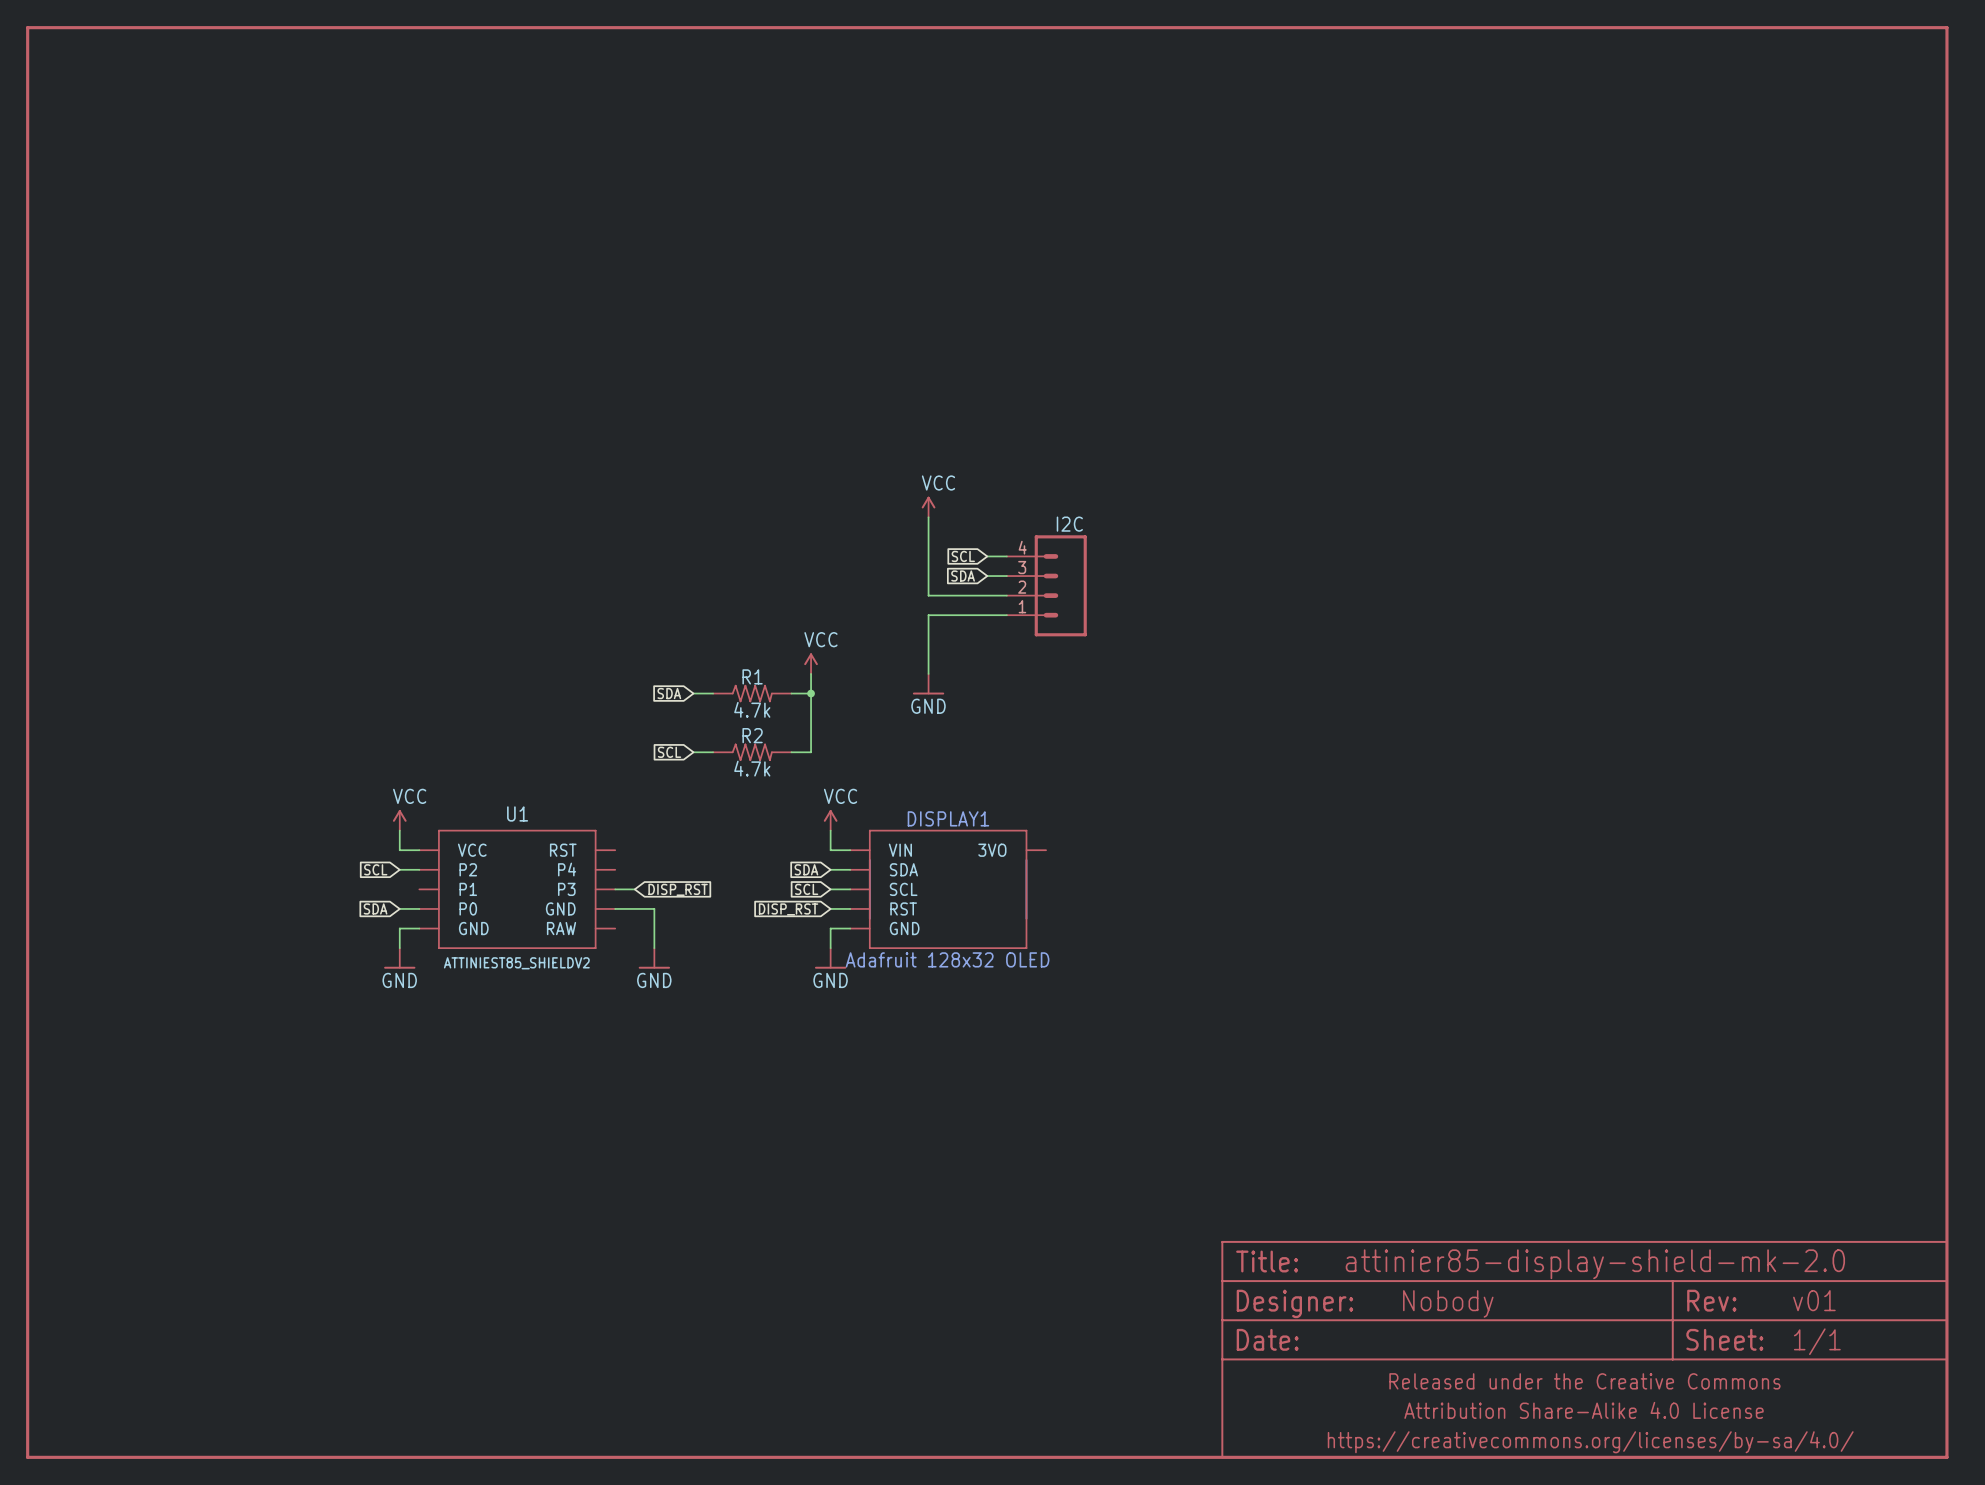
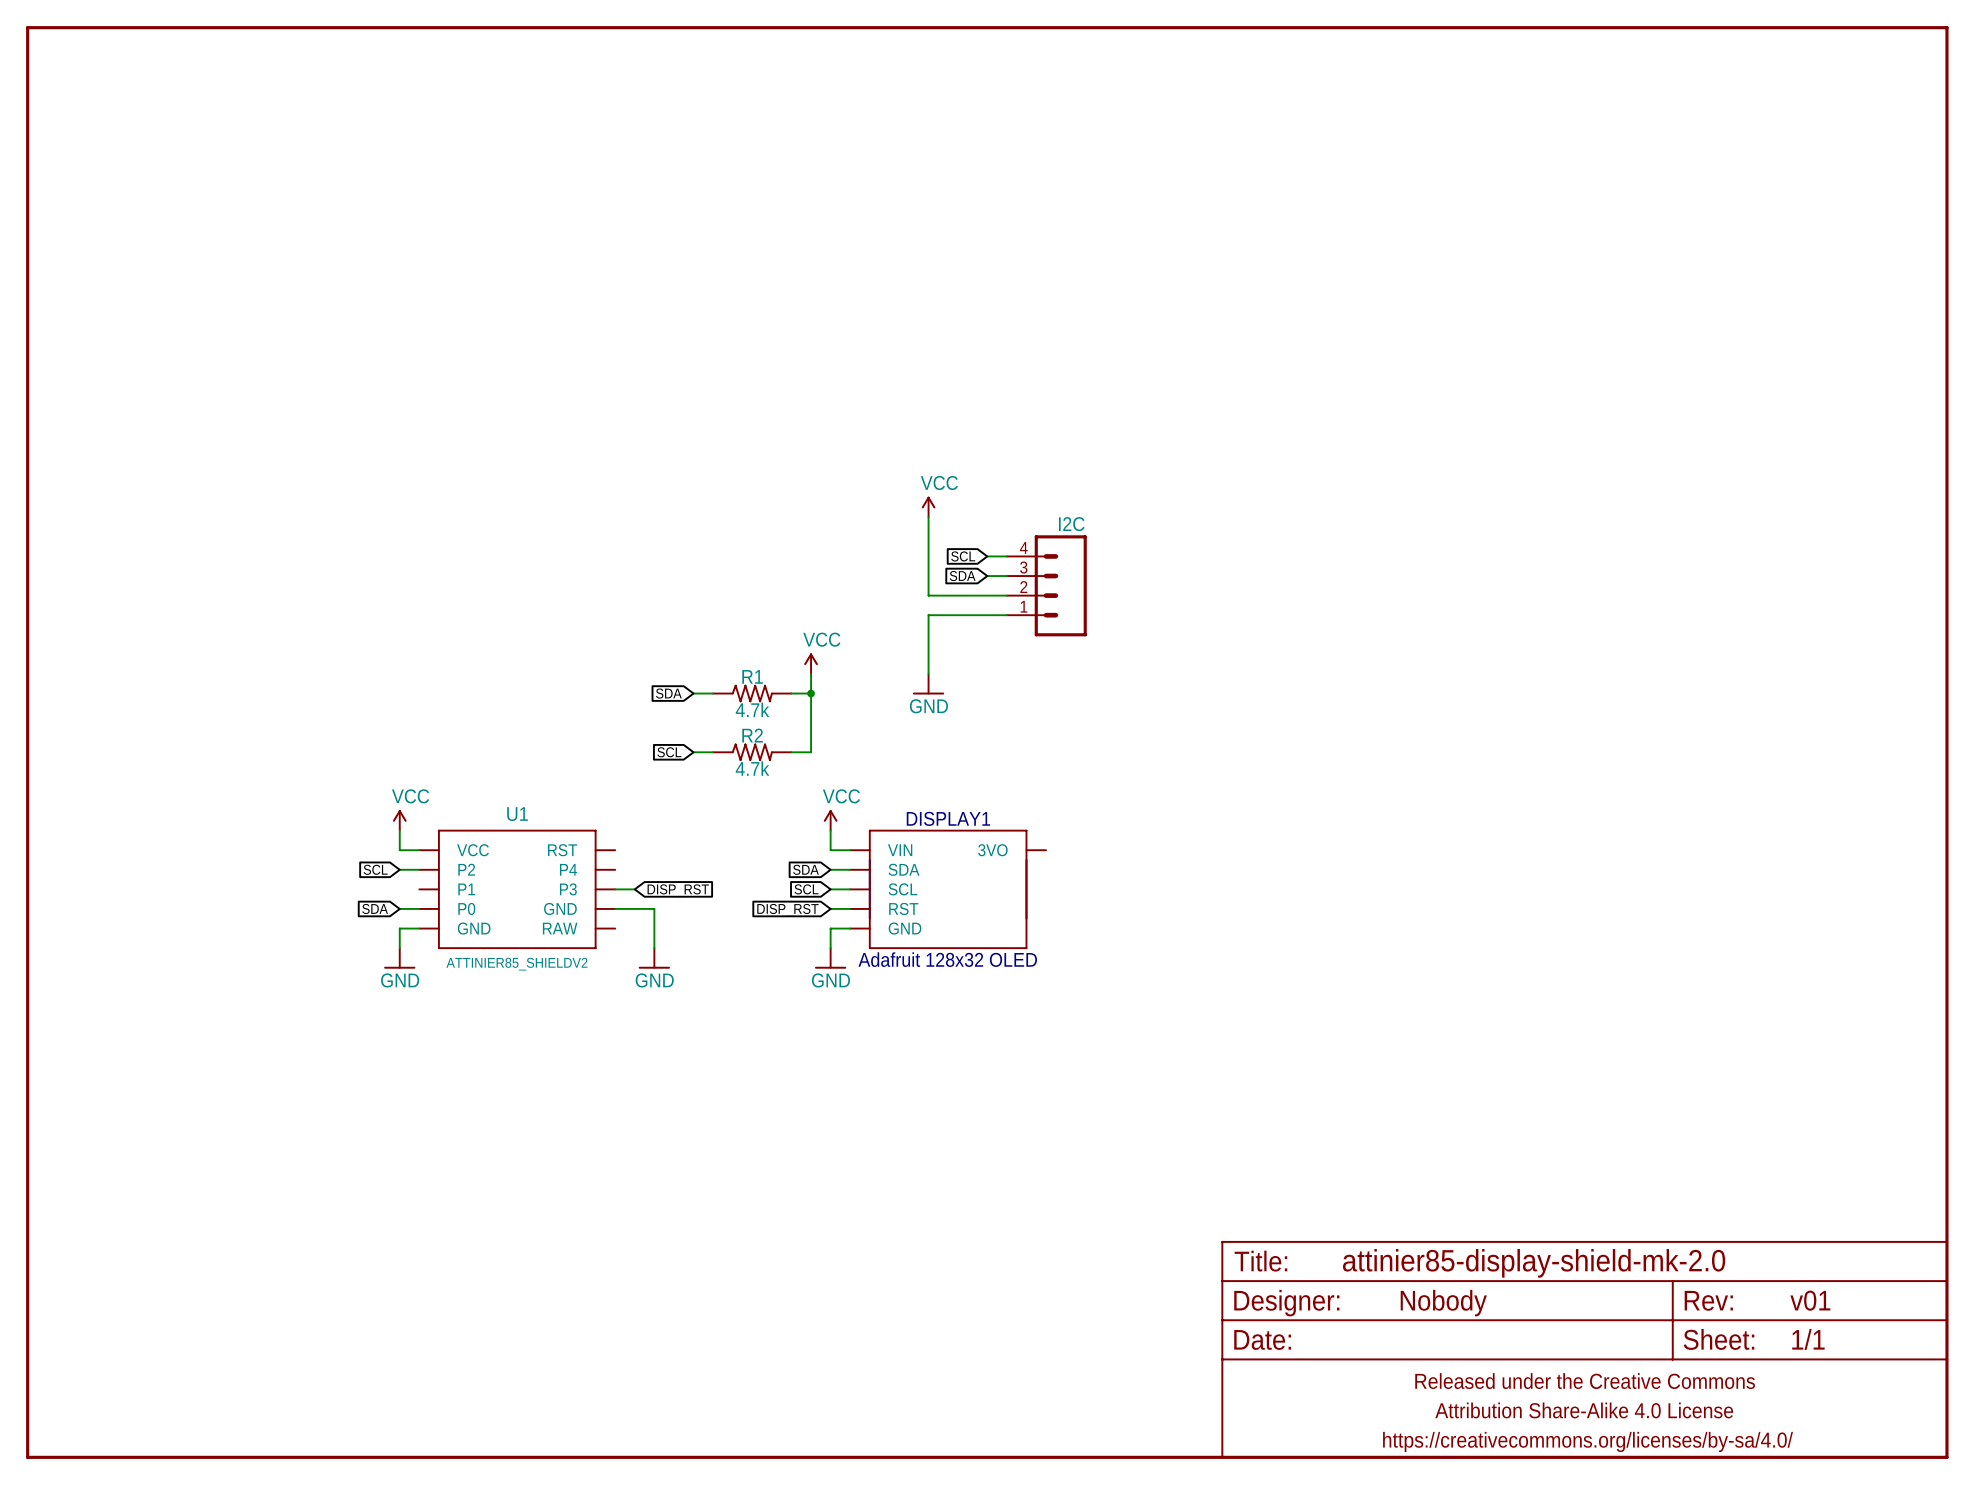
U1 value: ATTINIEST85_SHIELDV2 (516, 963) -> ATTINIER85_SHIELDV2 (516, 964)

